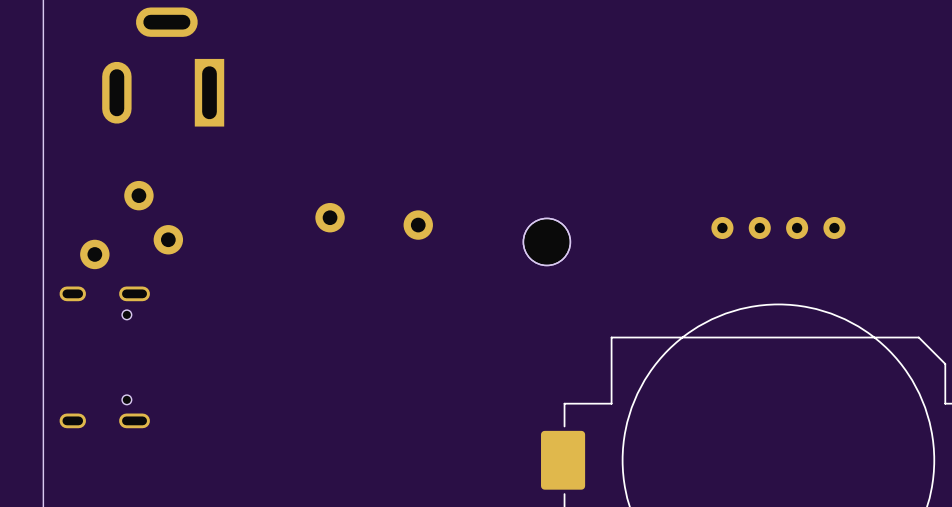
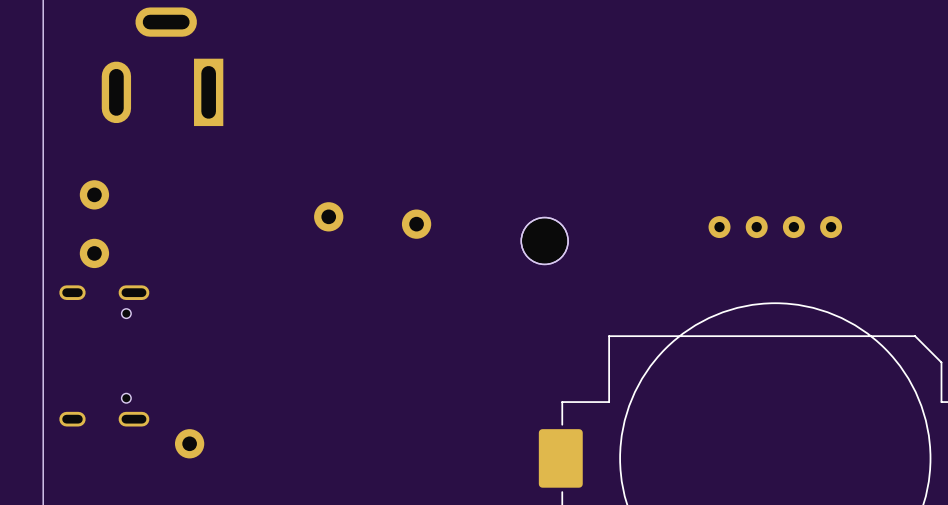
part: none -> (94, 194)
part: (138, 195) -> none
part: (168, 239) -> none
part: none -> (189, 443)

